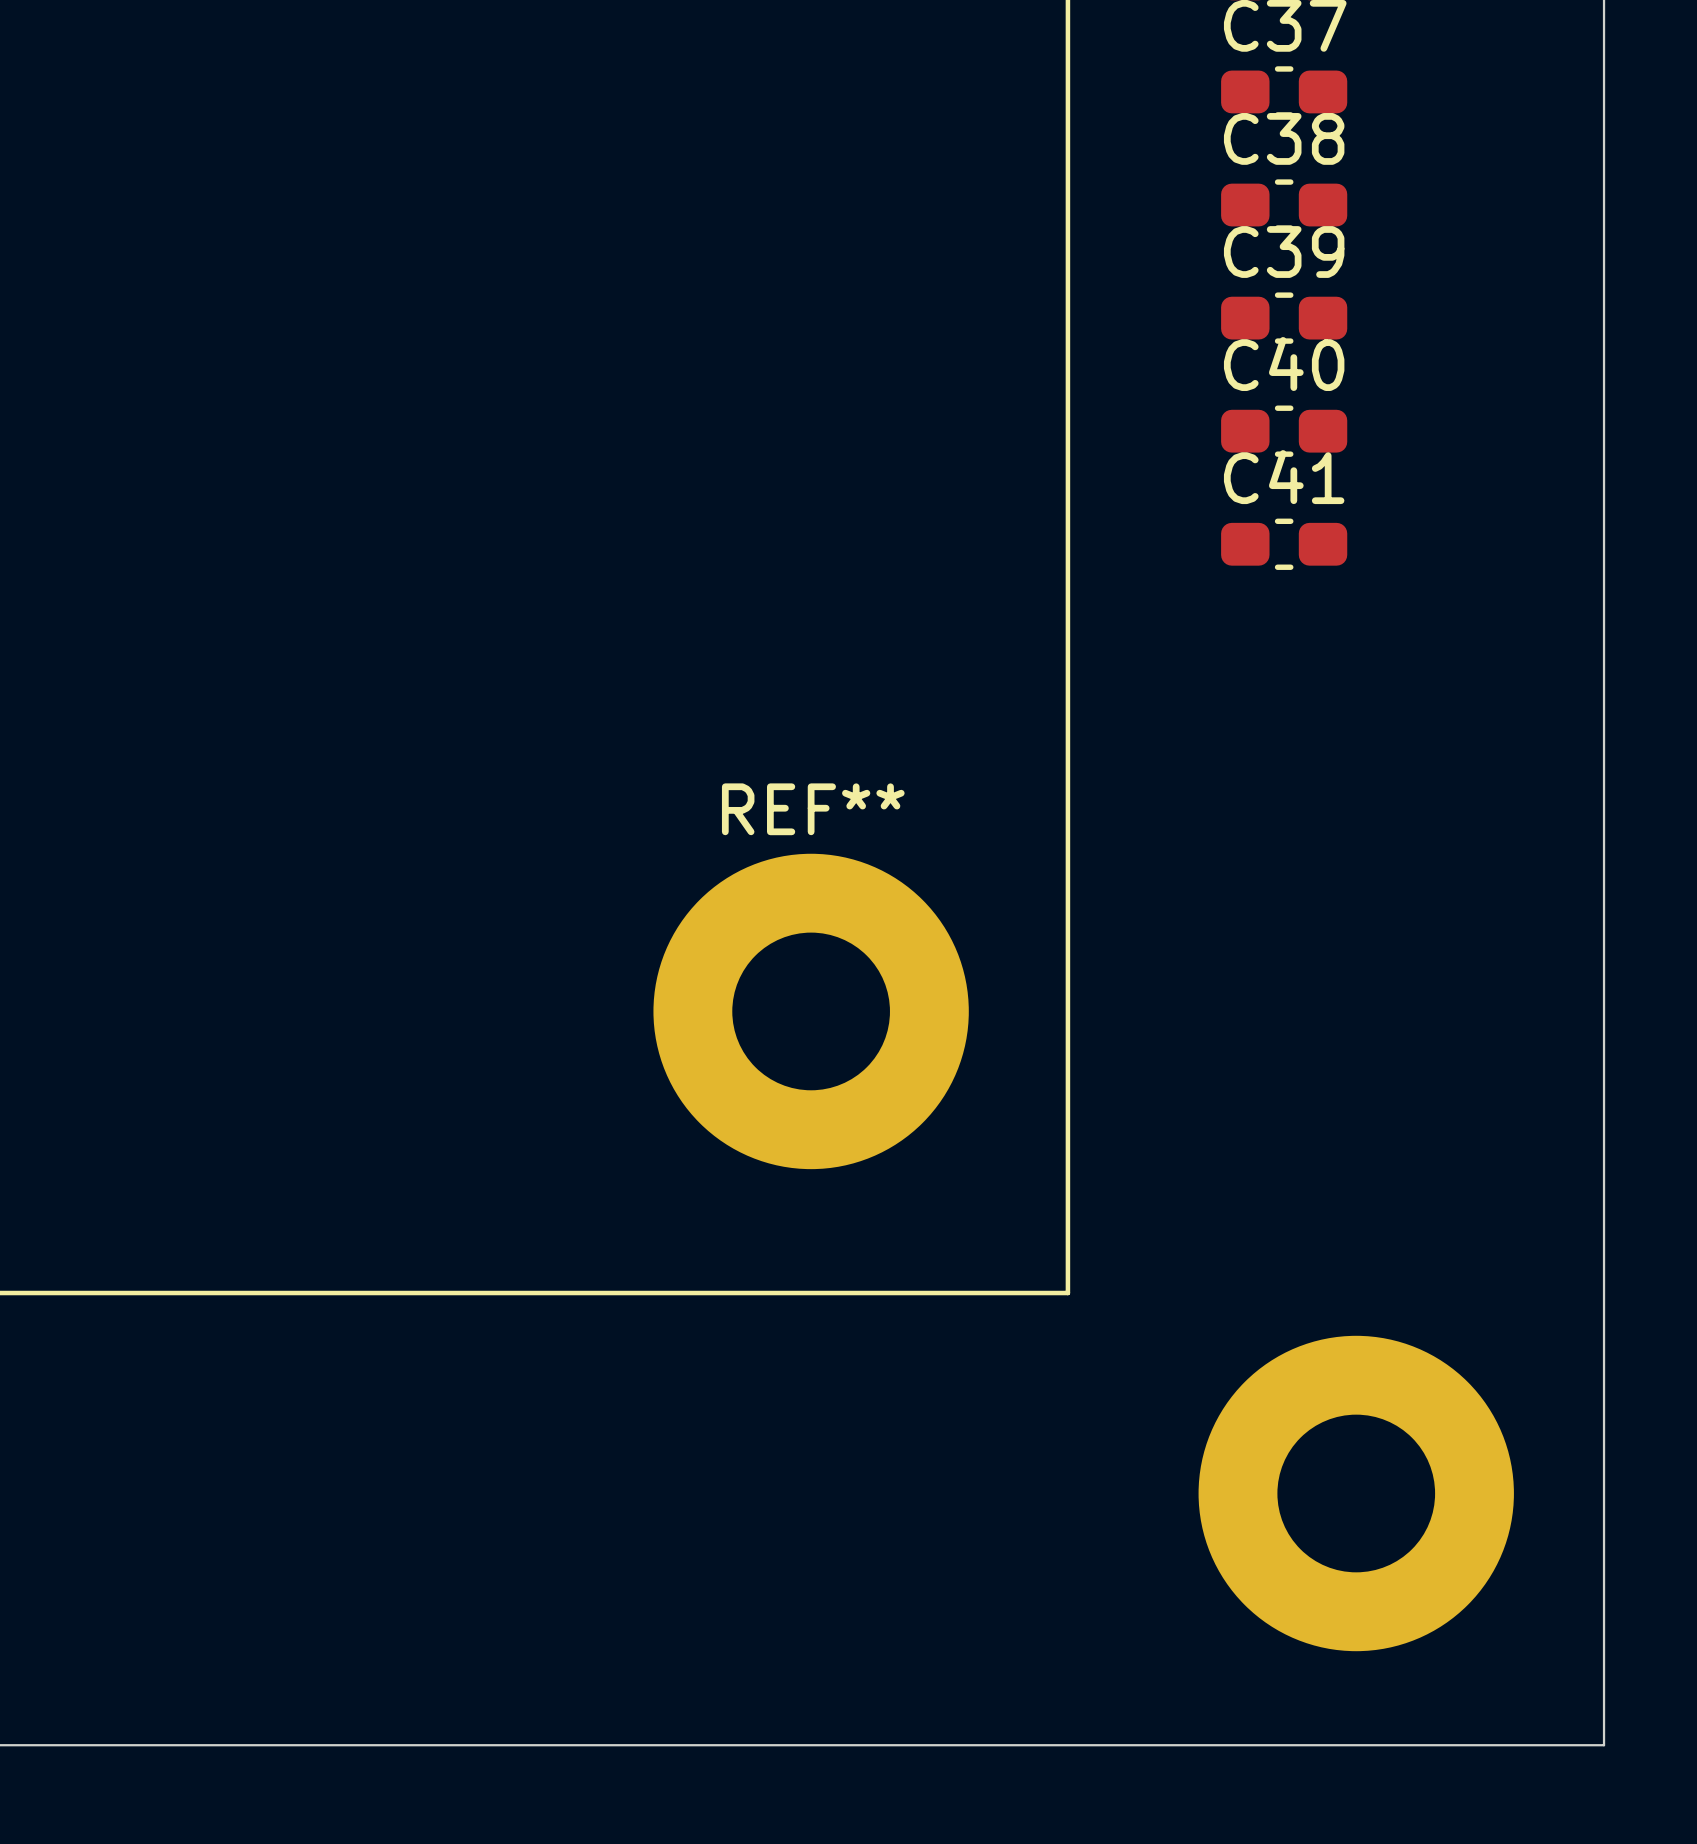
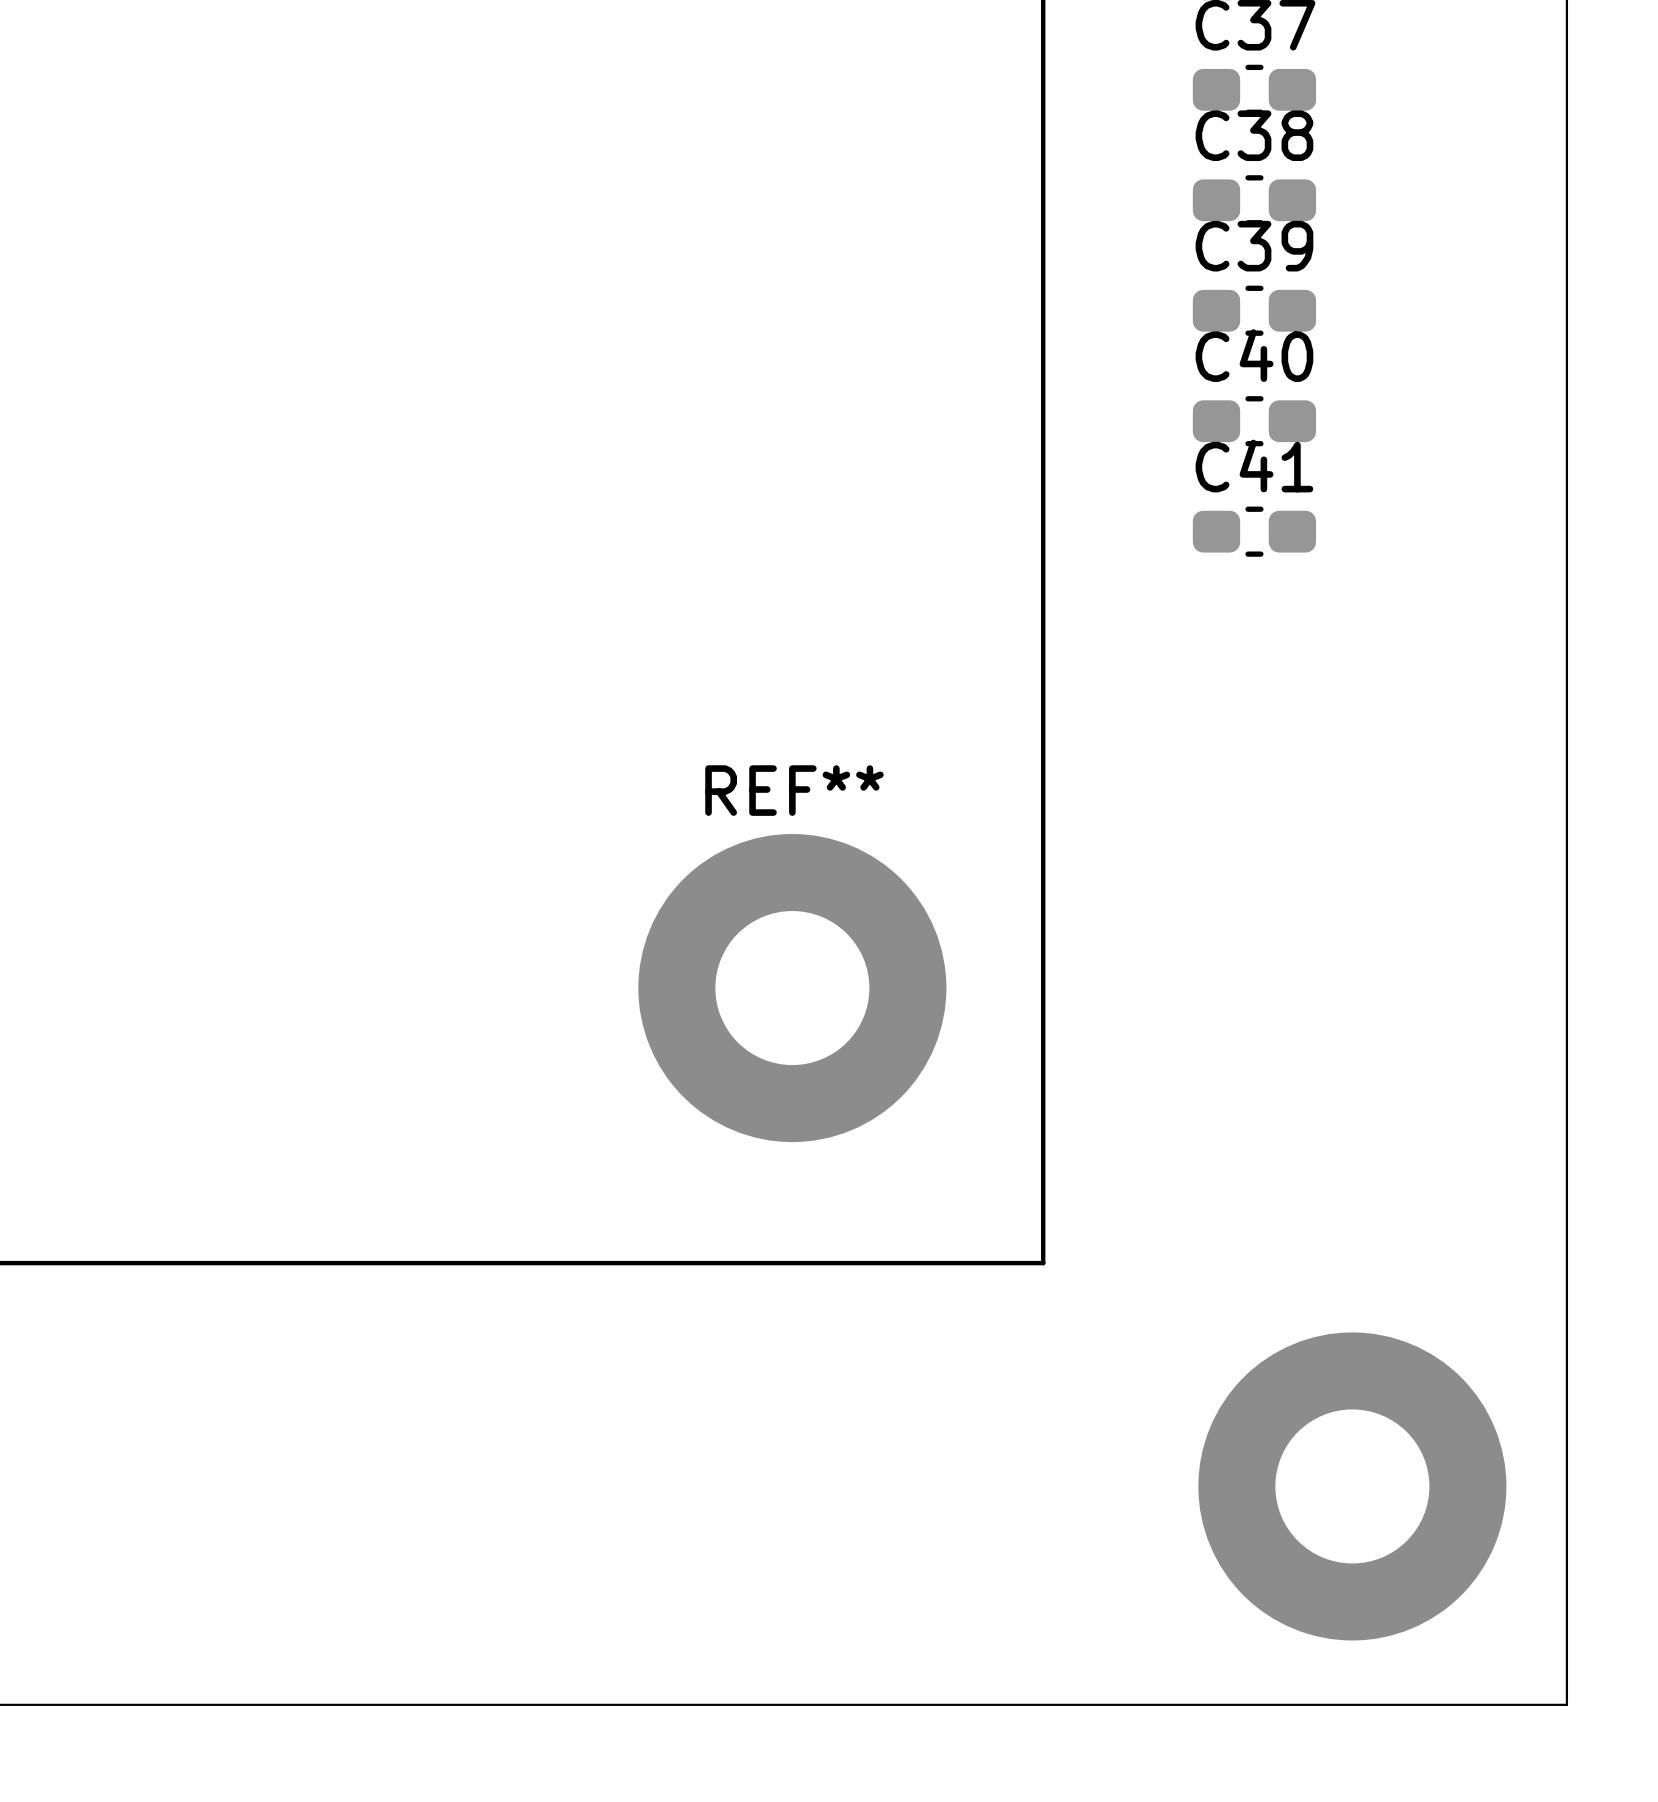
part position: (1356, 1493) -> (1352, 1486)

